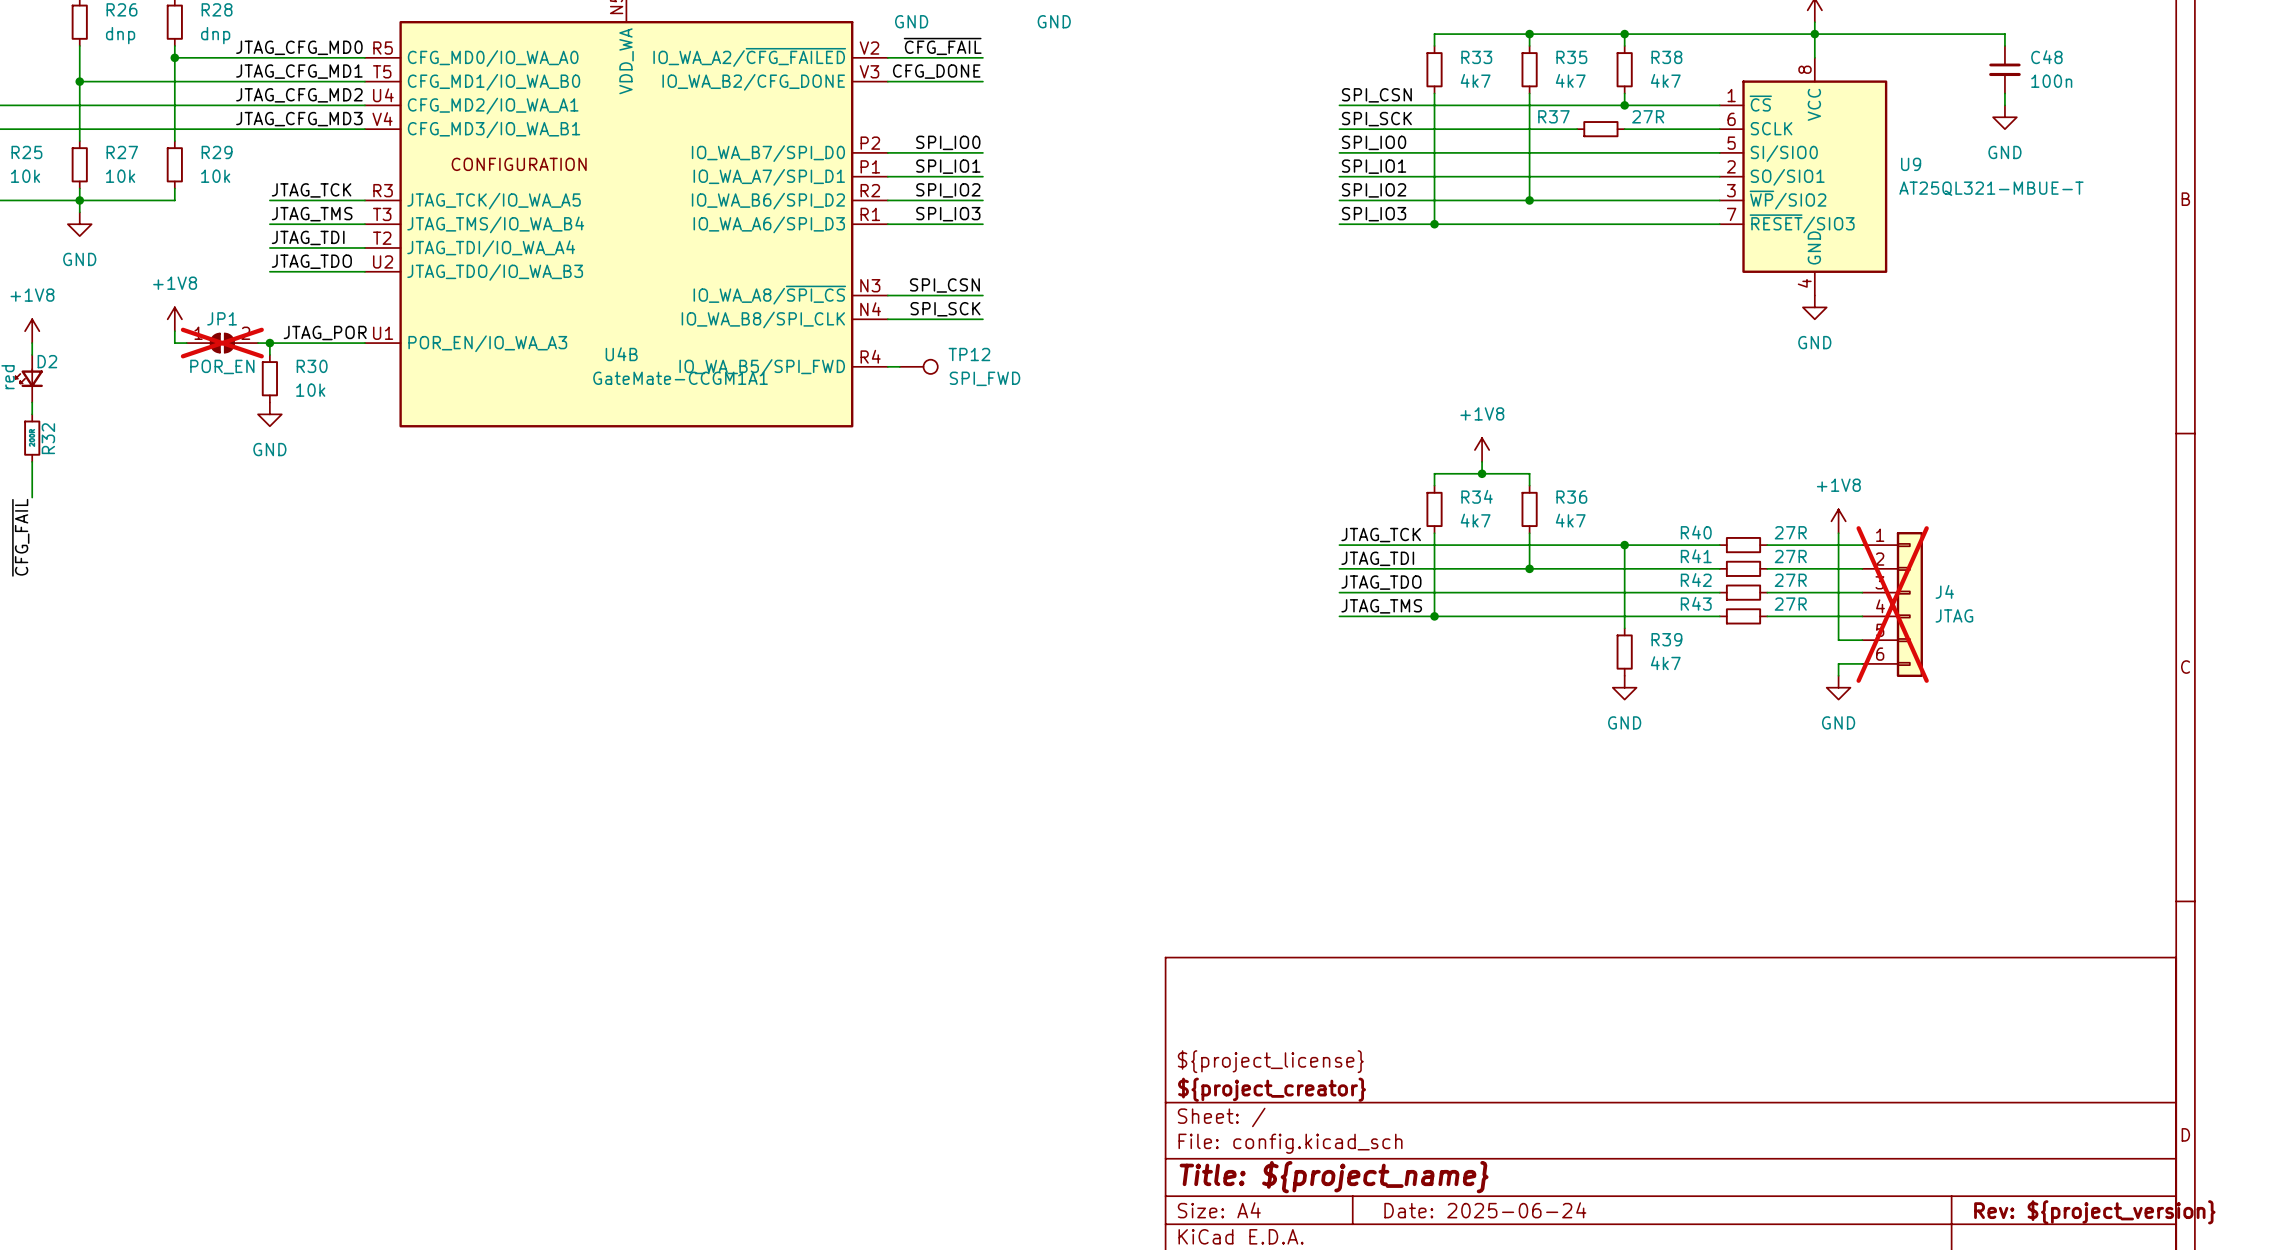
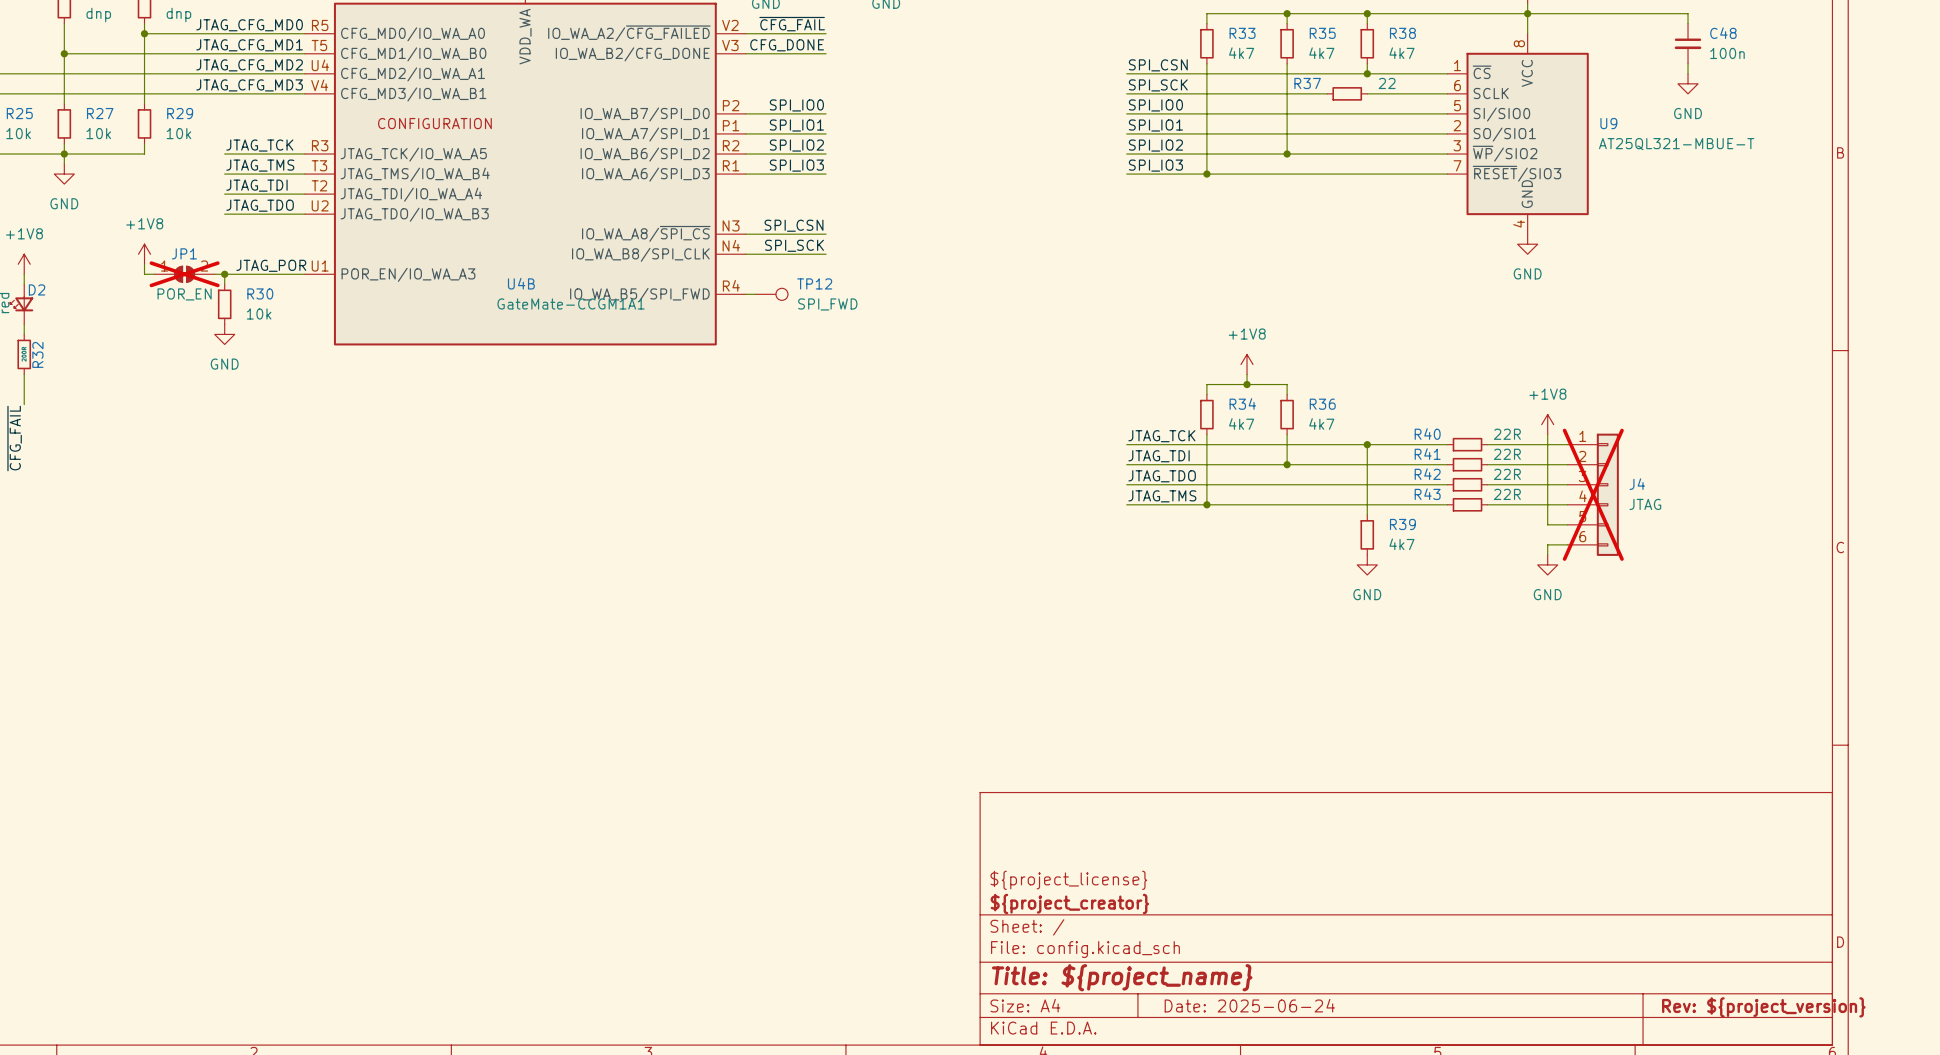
R37 value: 27R (1648, 116) -> 22 (1387, 83)
R40 value: 27R (1790, 532) -> 22R (1507, 434)
R41 value: 27R (1790, 556) -> 22R (1507, 454)
R42 value: 27R (1790, 580) -> 22R (1507, 474)
R43 value: 27R (1790, 604) -> 22R (1507, 494)

